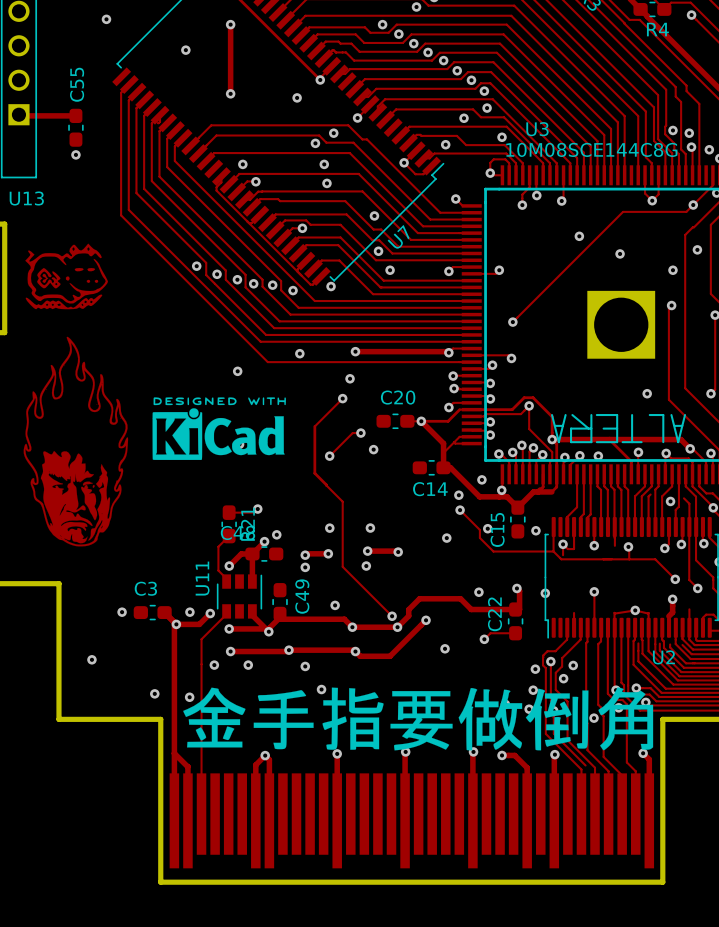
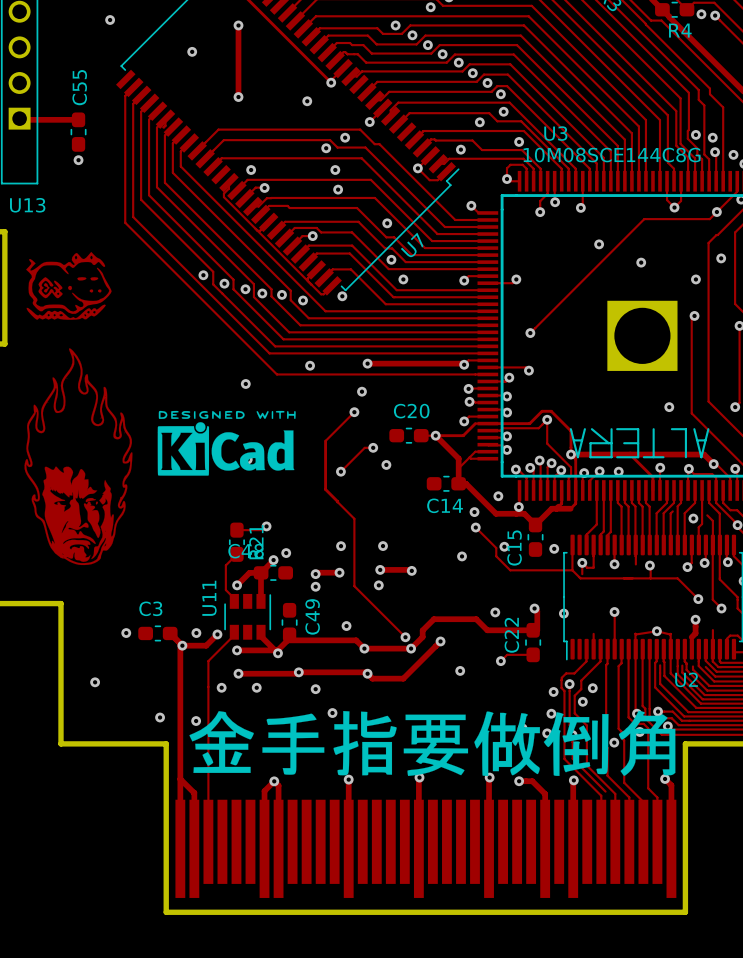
via: none -> (701, 14)

